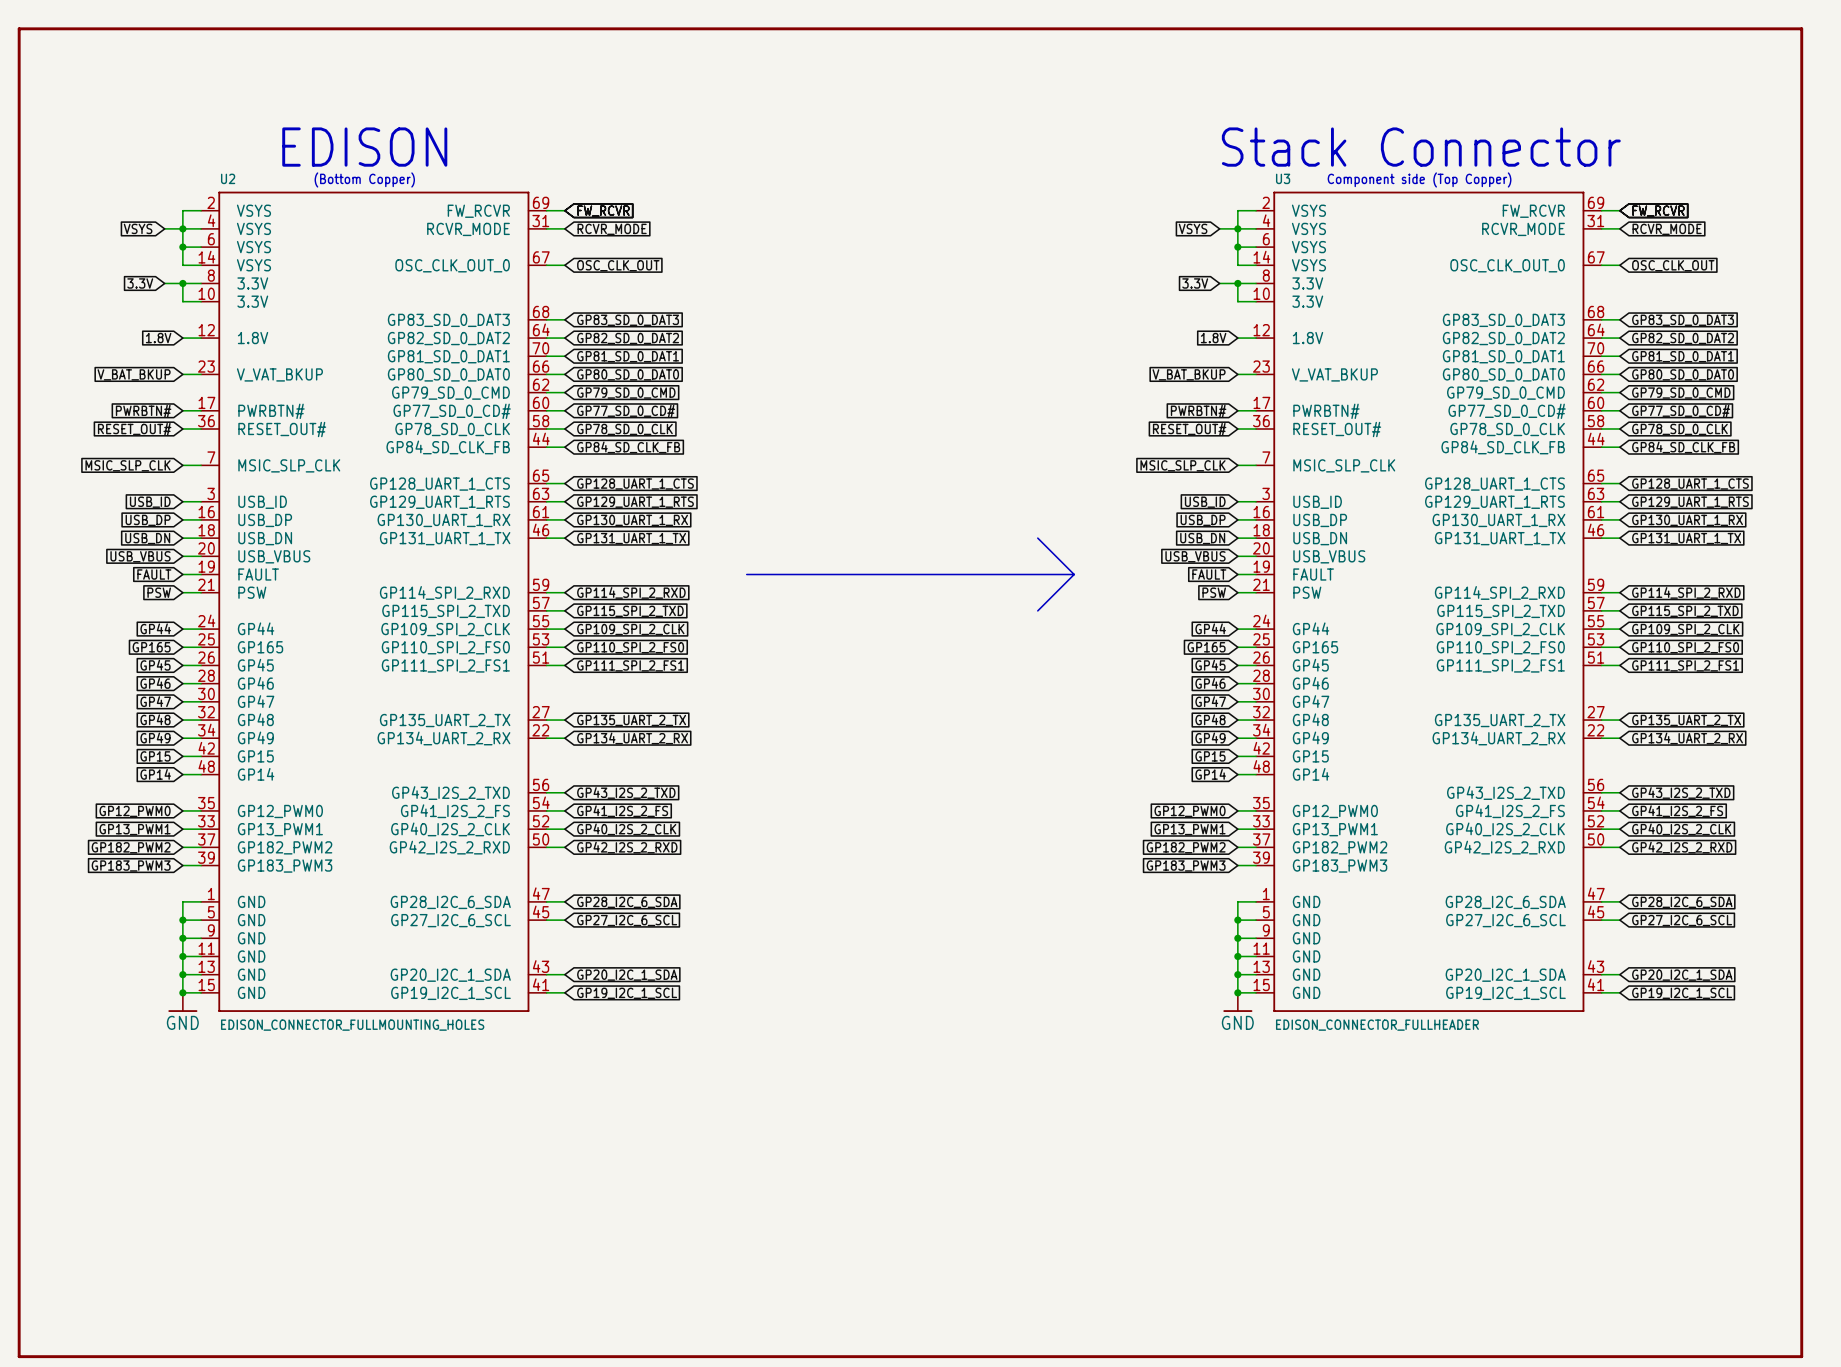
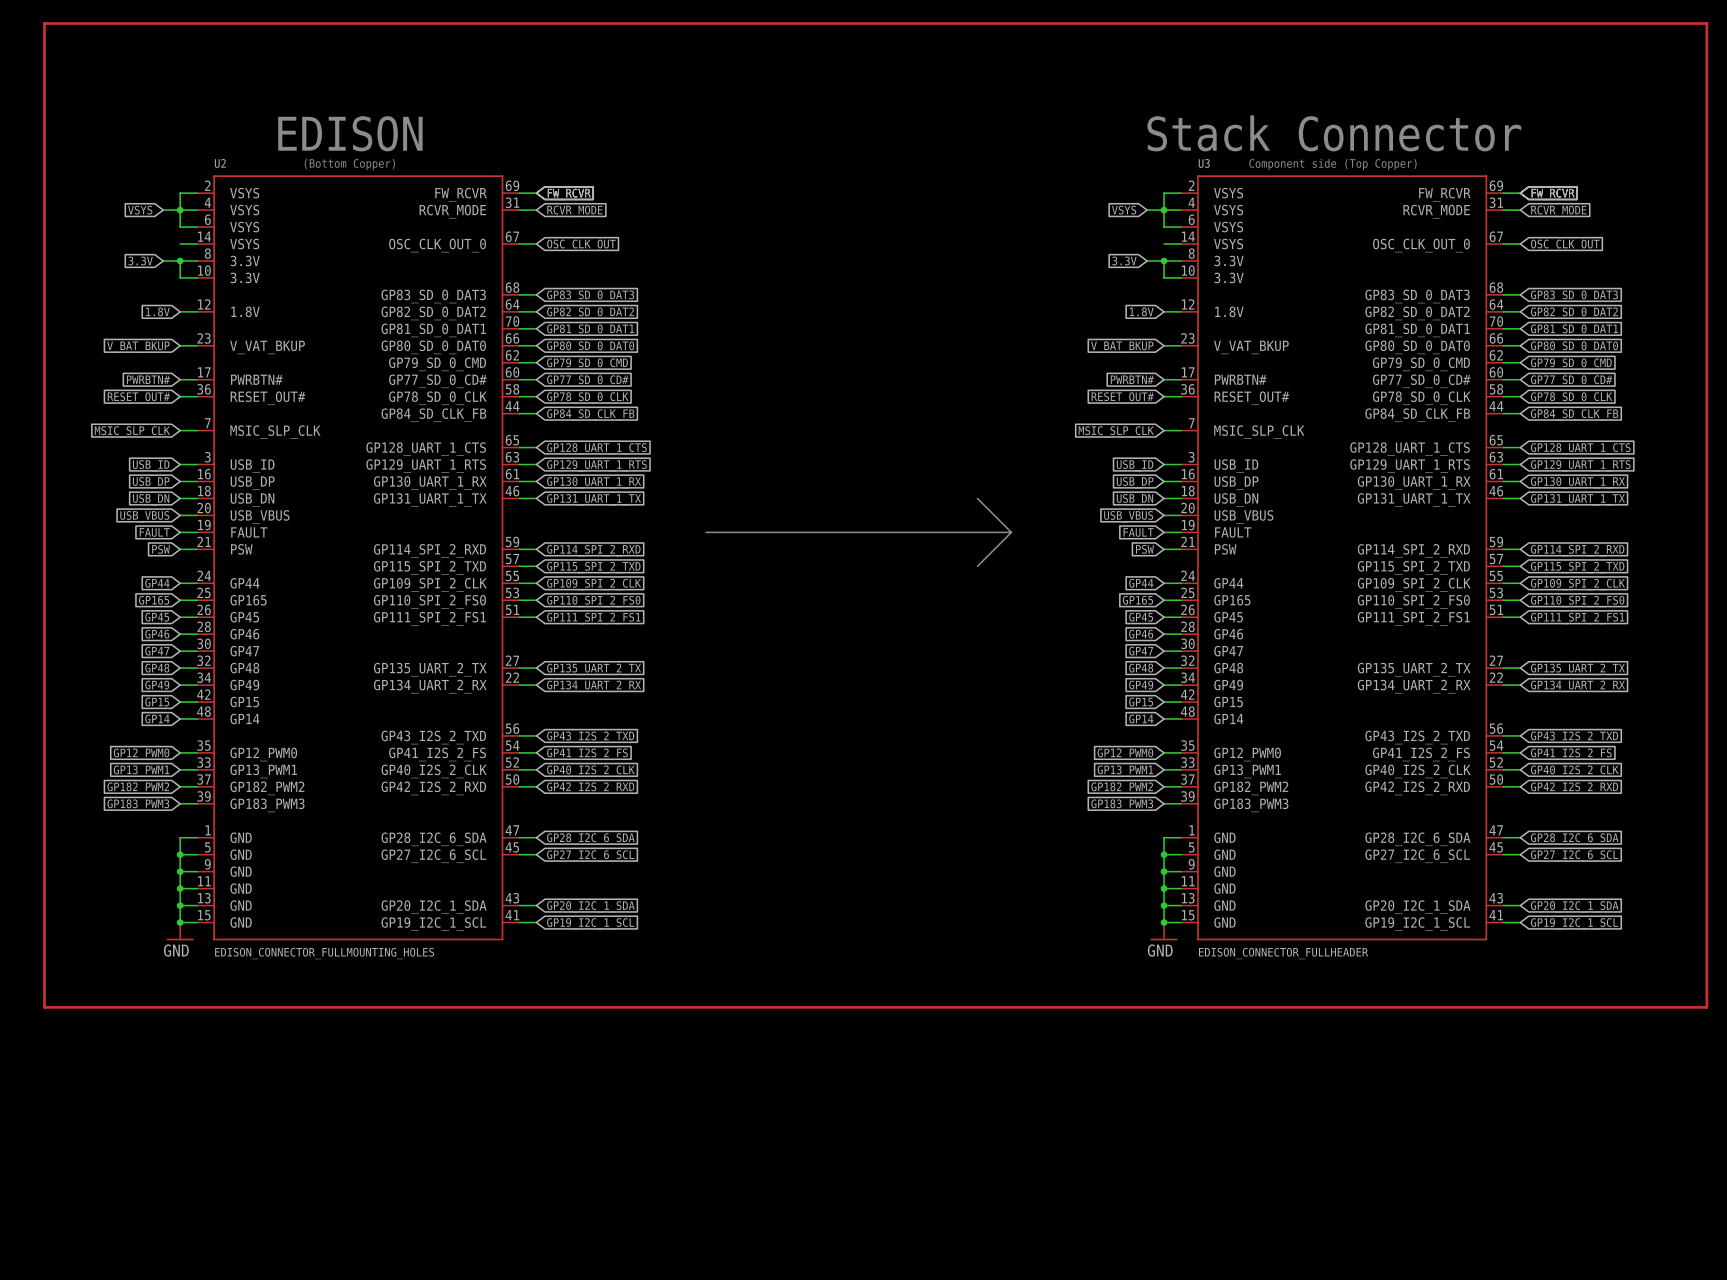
line: none -> (44, 23) (1706, 23) (1706, 1007) (44, 1007) (44, 23)
wire: (182, 247) (182, 265) -> none
junction: (182, 247) -> none
wire: (1237, 247) (1237, 265) -> none
junction: (1237, 247) -> none
part: (910, 692) -> none

